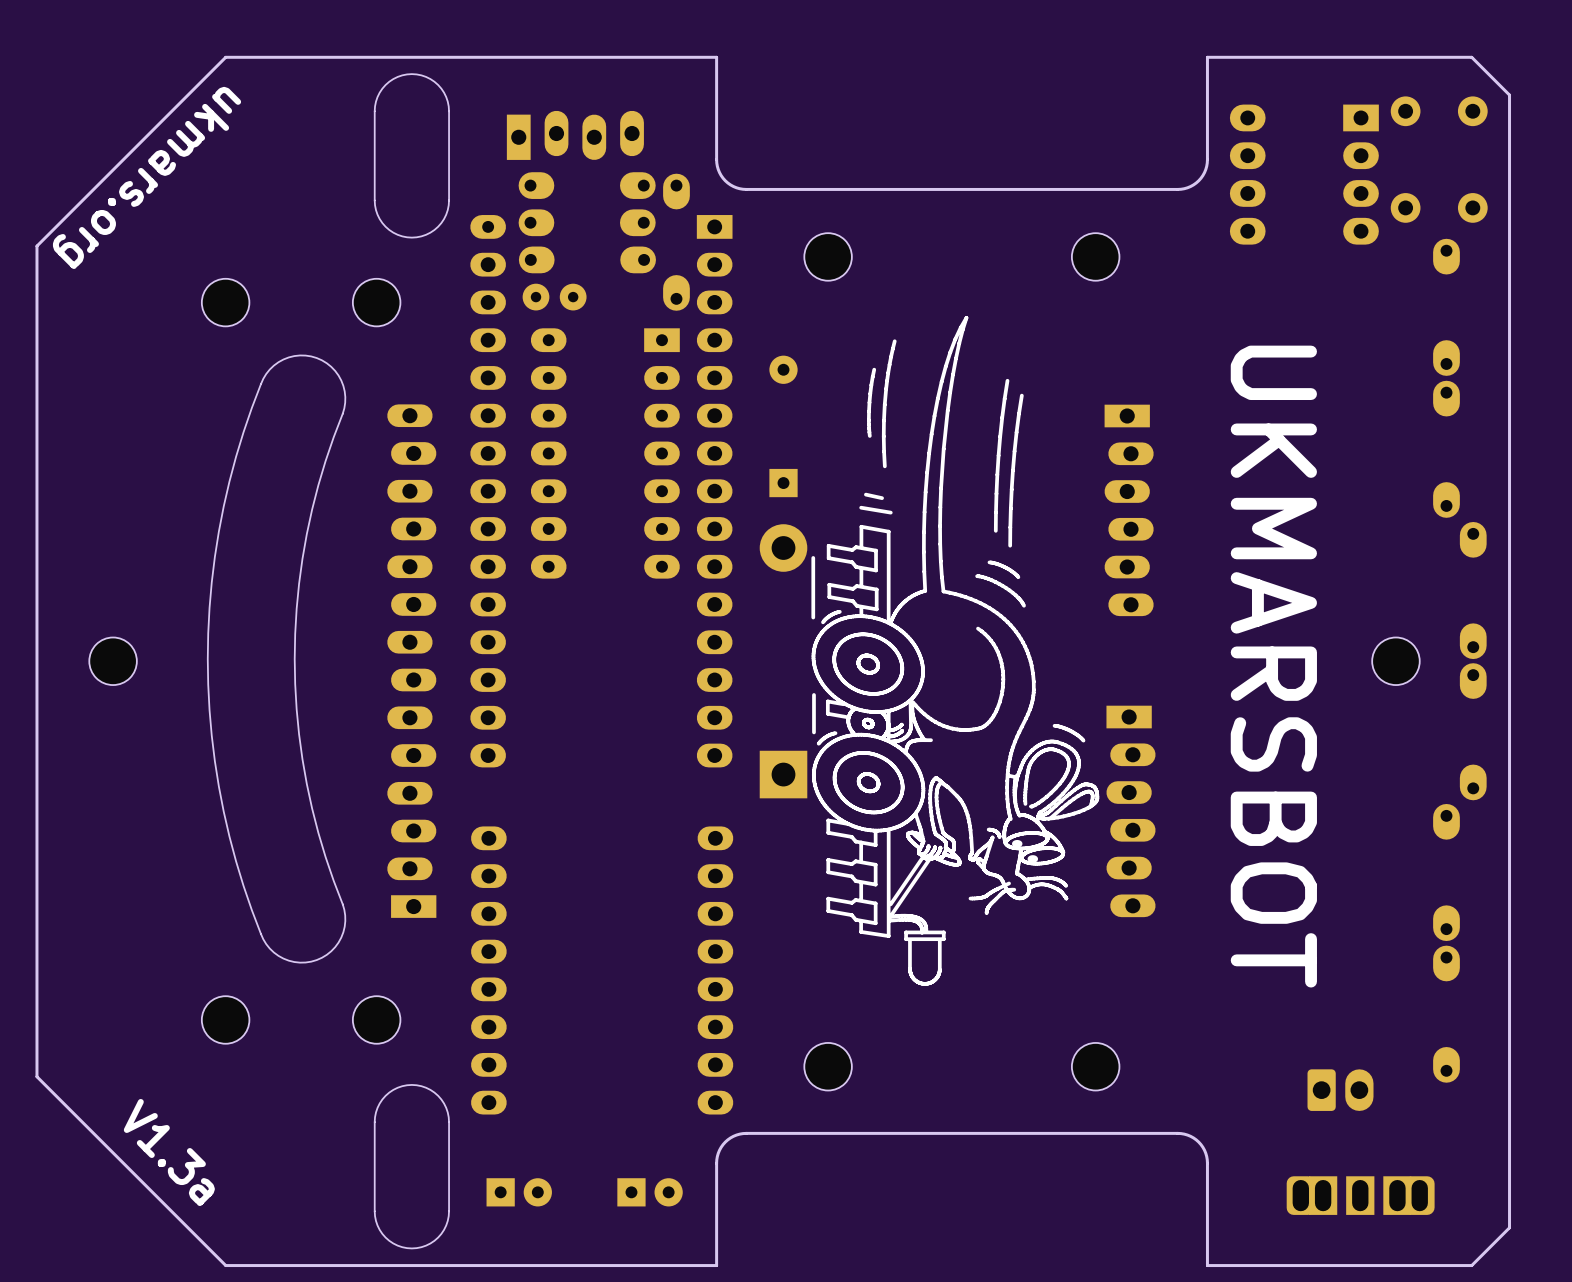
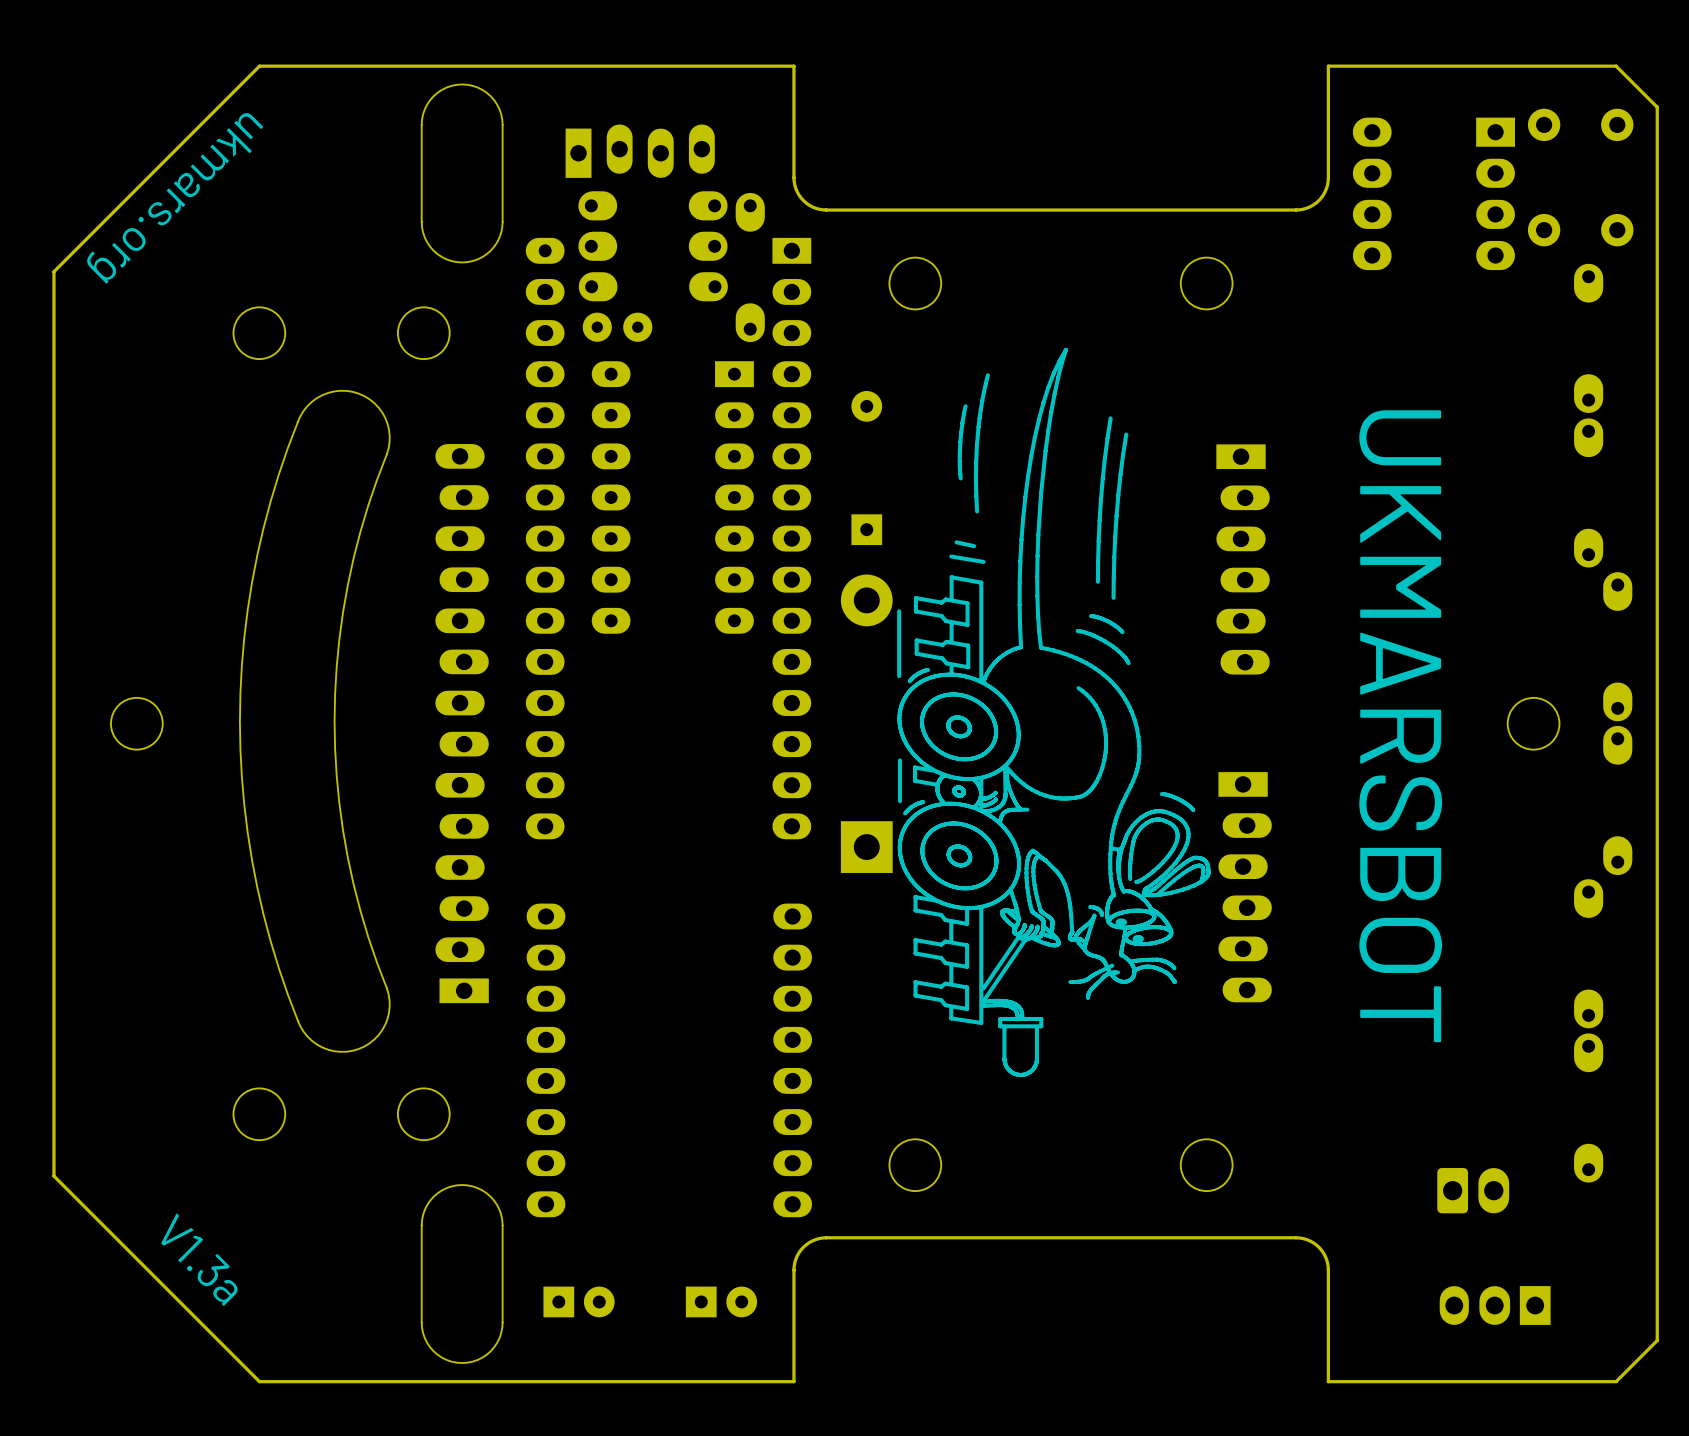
part footprint: [1286, 1176, 1435, 1215] -> [1439, 1286, 1551, 1325]

